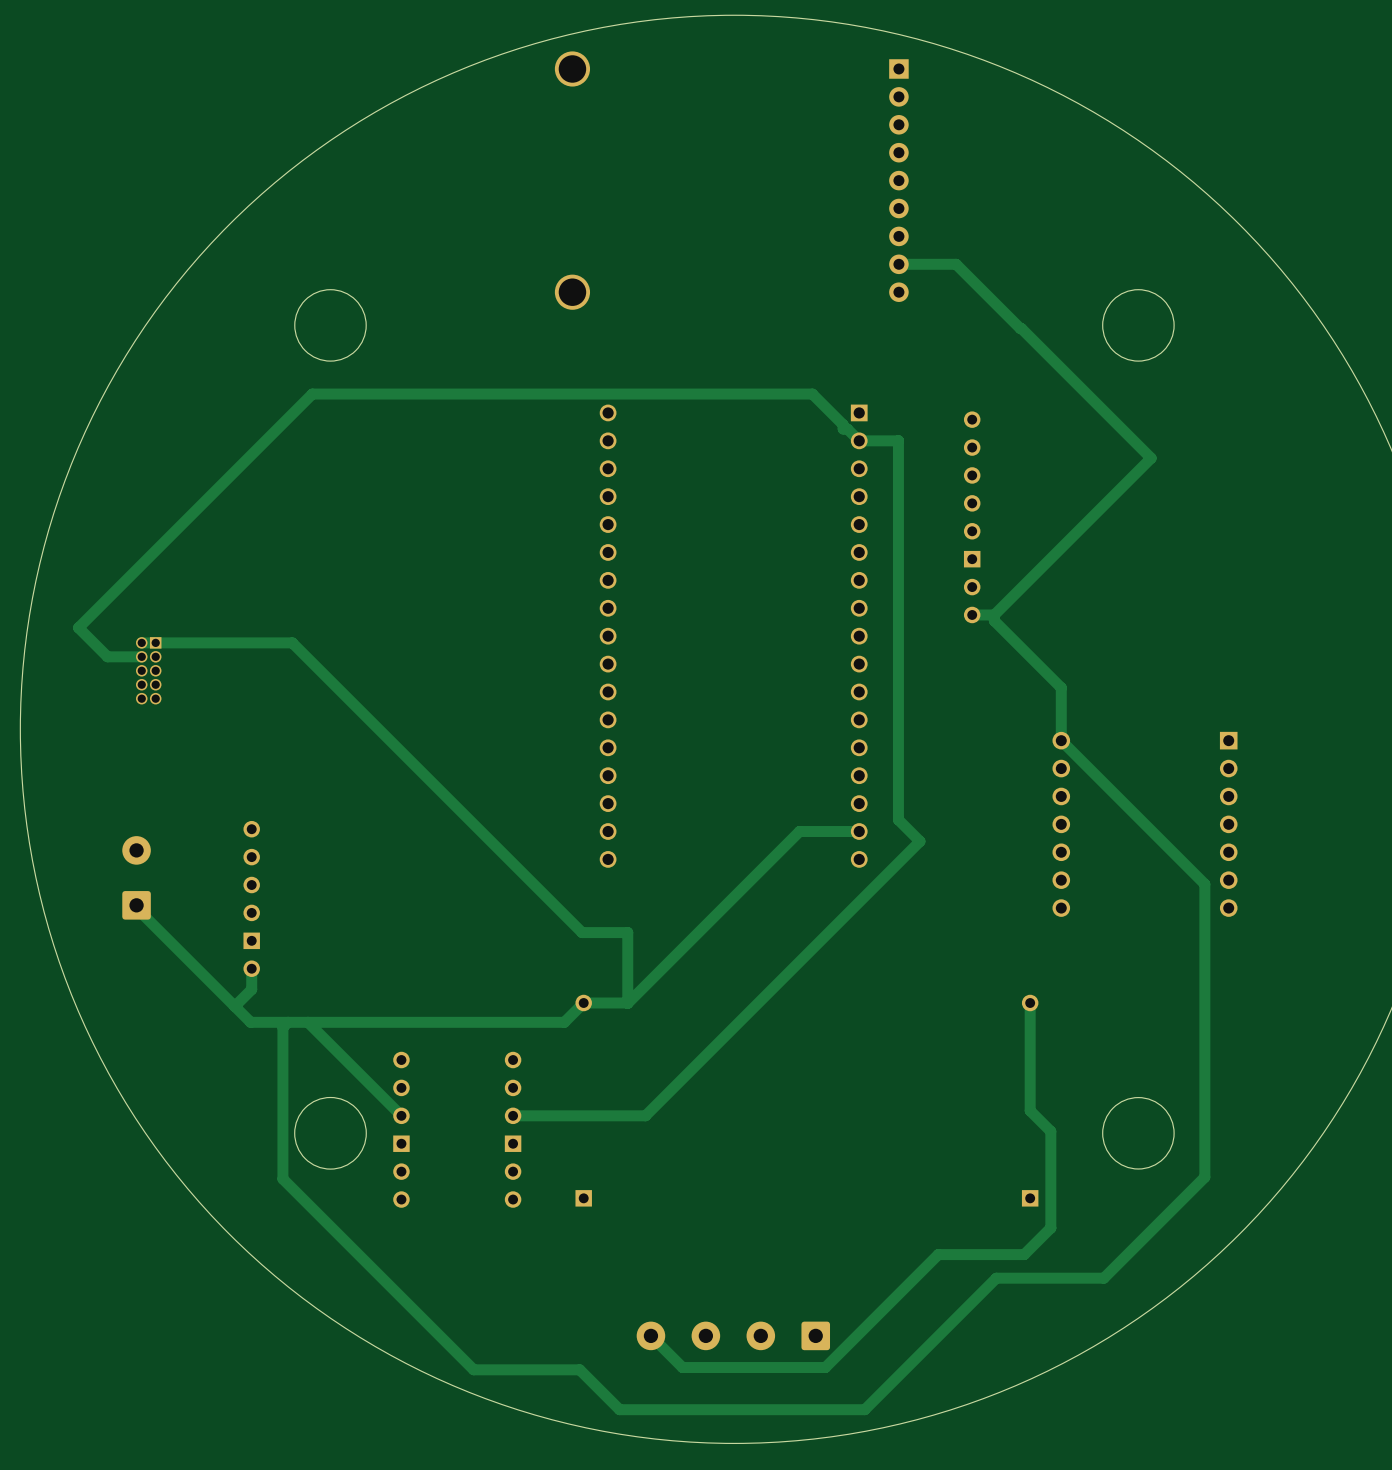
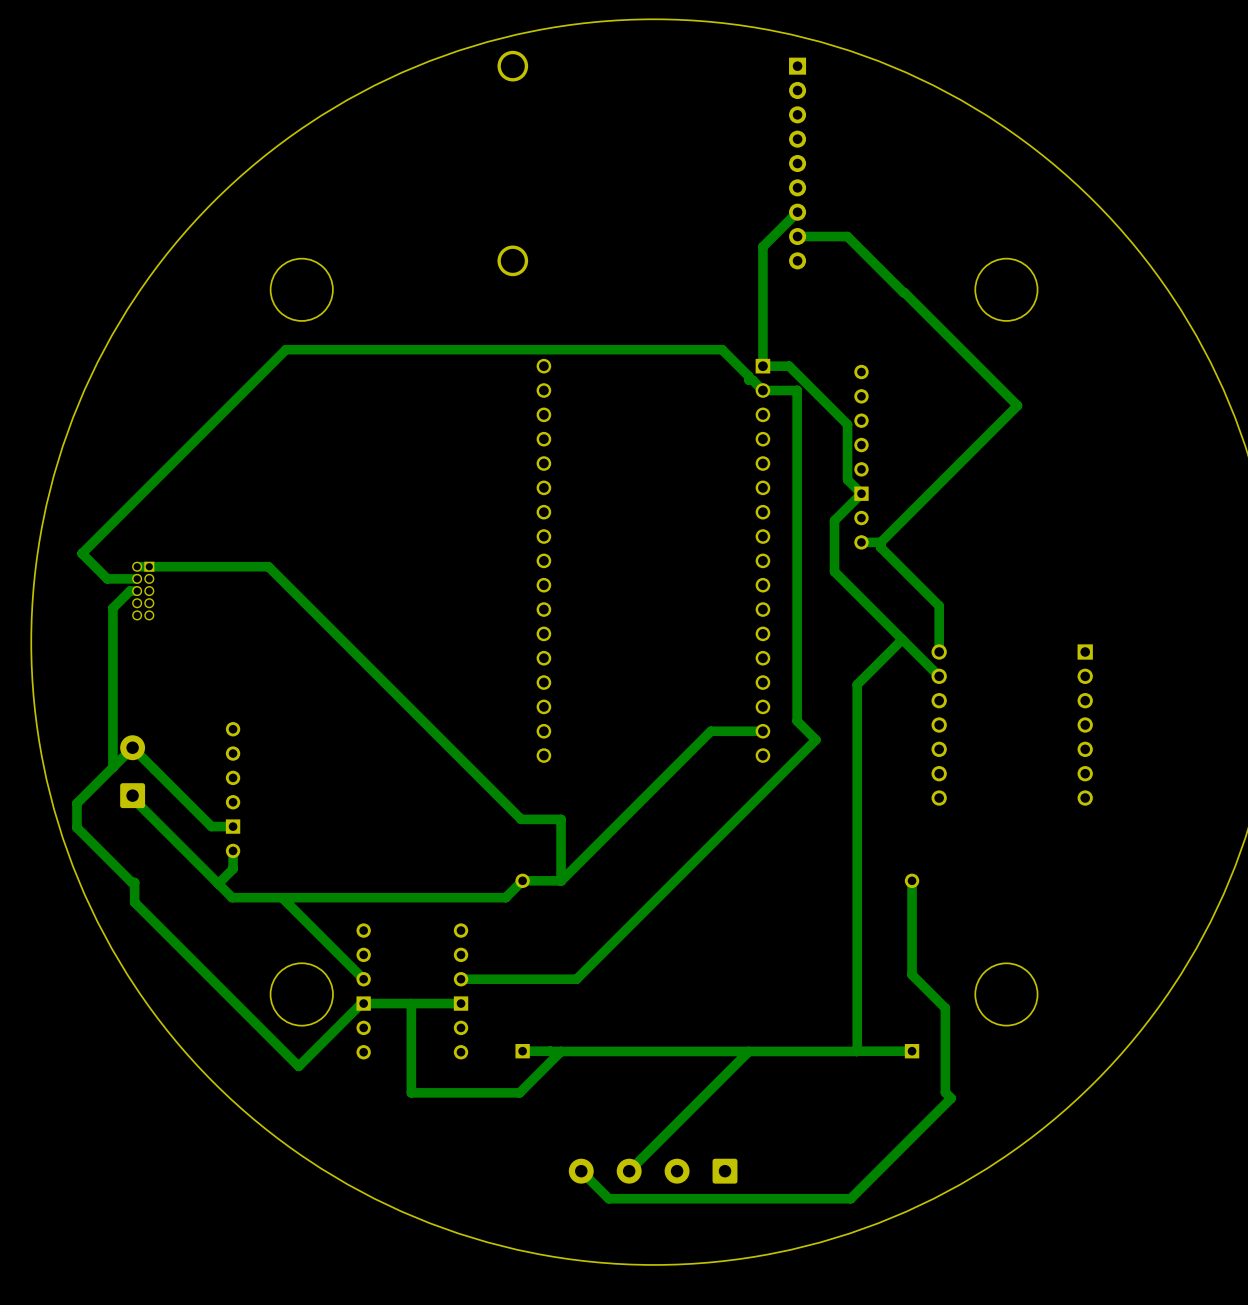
track: none -> (797, 212) (762, 246) (762, 366) (789, 366) (847, 424) (847, 479) (861, 493) (834, 520) (834, 571) (939, 676)
track: none -> (137, 591) (130, 591) (112, 608) (112, 767)
track: none -> (902, 639) (857, 684) (857, 1051)
track: (1061, 740) (1204, 884) (1204, 1177) (1103, 1278) (996, 1278) (864, 1409) (619, 1409) (579, 1369) (473, 1369) (282, 1178) (282, 1027) (288, 1022) -> none
track: none -> (233, 826) (211, 826) (132, 747) (76, 803) (76, 827) (131, 882) (134, 882) (134, 902) (298, 1066) (361, 1003)
track: (1050, 1131) (1050, 1228) (1024, 1254) (938, 1254) (825, 1367) -> (930, 992) (945, 1008) (945, 1092) (951, 1098) (850, 1198) (733, 1198)
track: none -> (410, 1003) (411, 1092) (519, 1092) (561, 1051)
track: none -> (461, 1003) (363, 1003)
track: none -> (522, 1051) (857, 1051)
track: none -> (748, 1051) (629, 1171)
track: none -> (912, 1051) (857, 1051)

